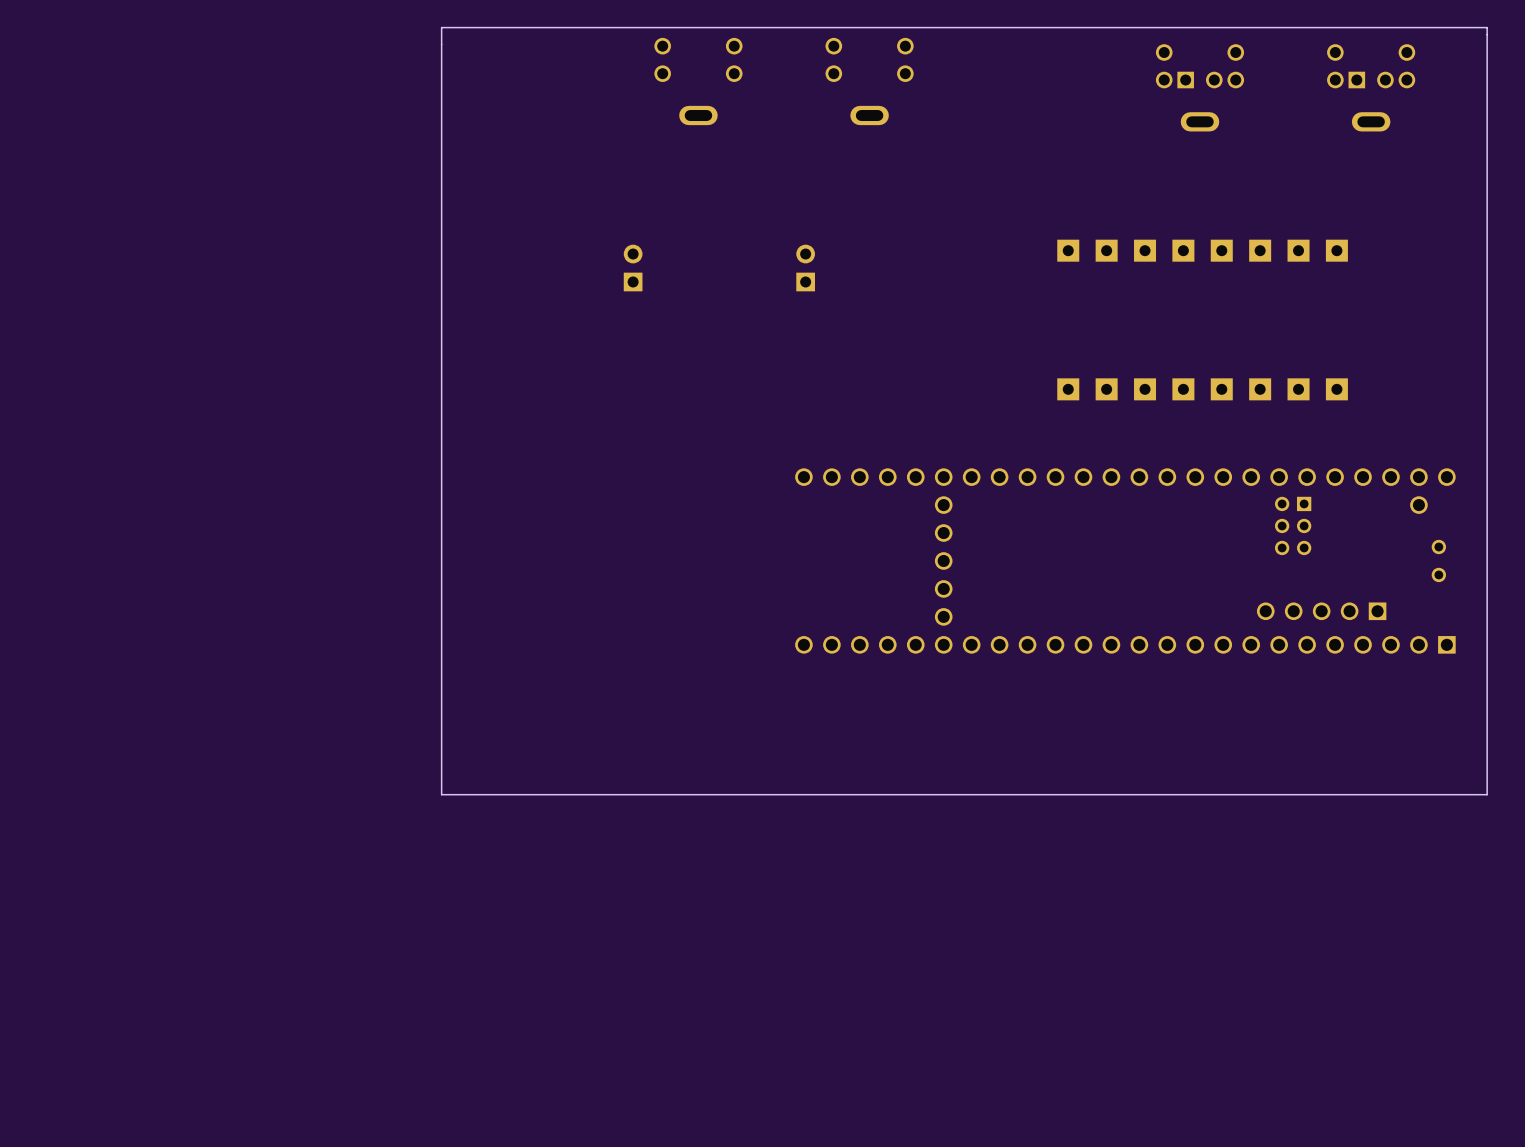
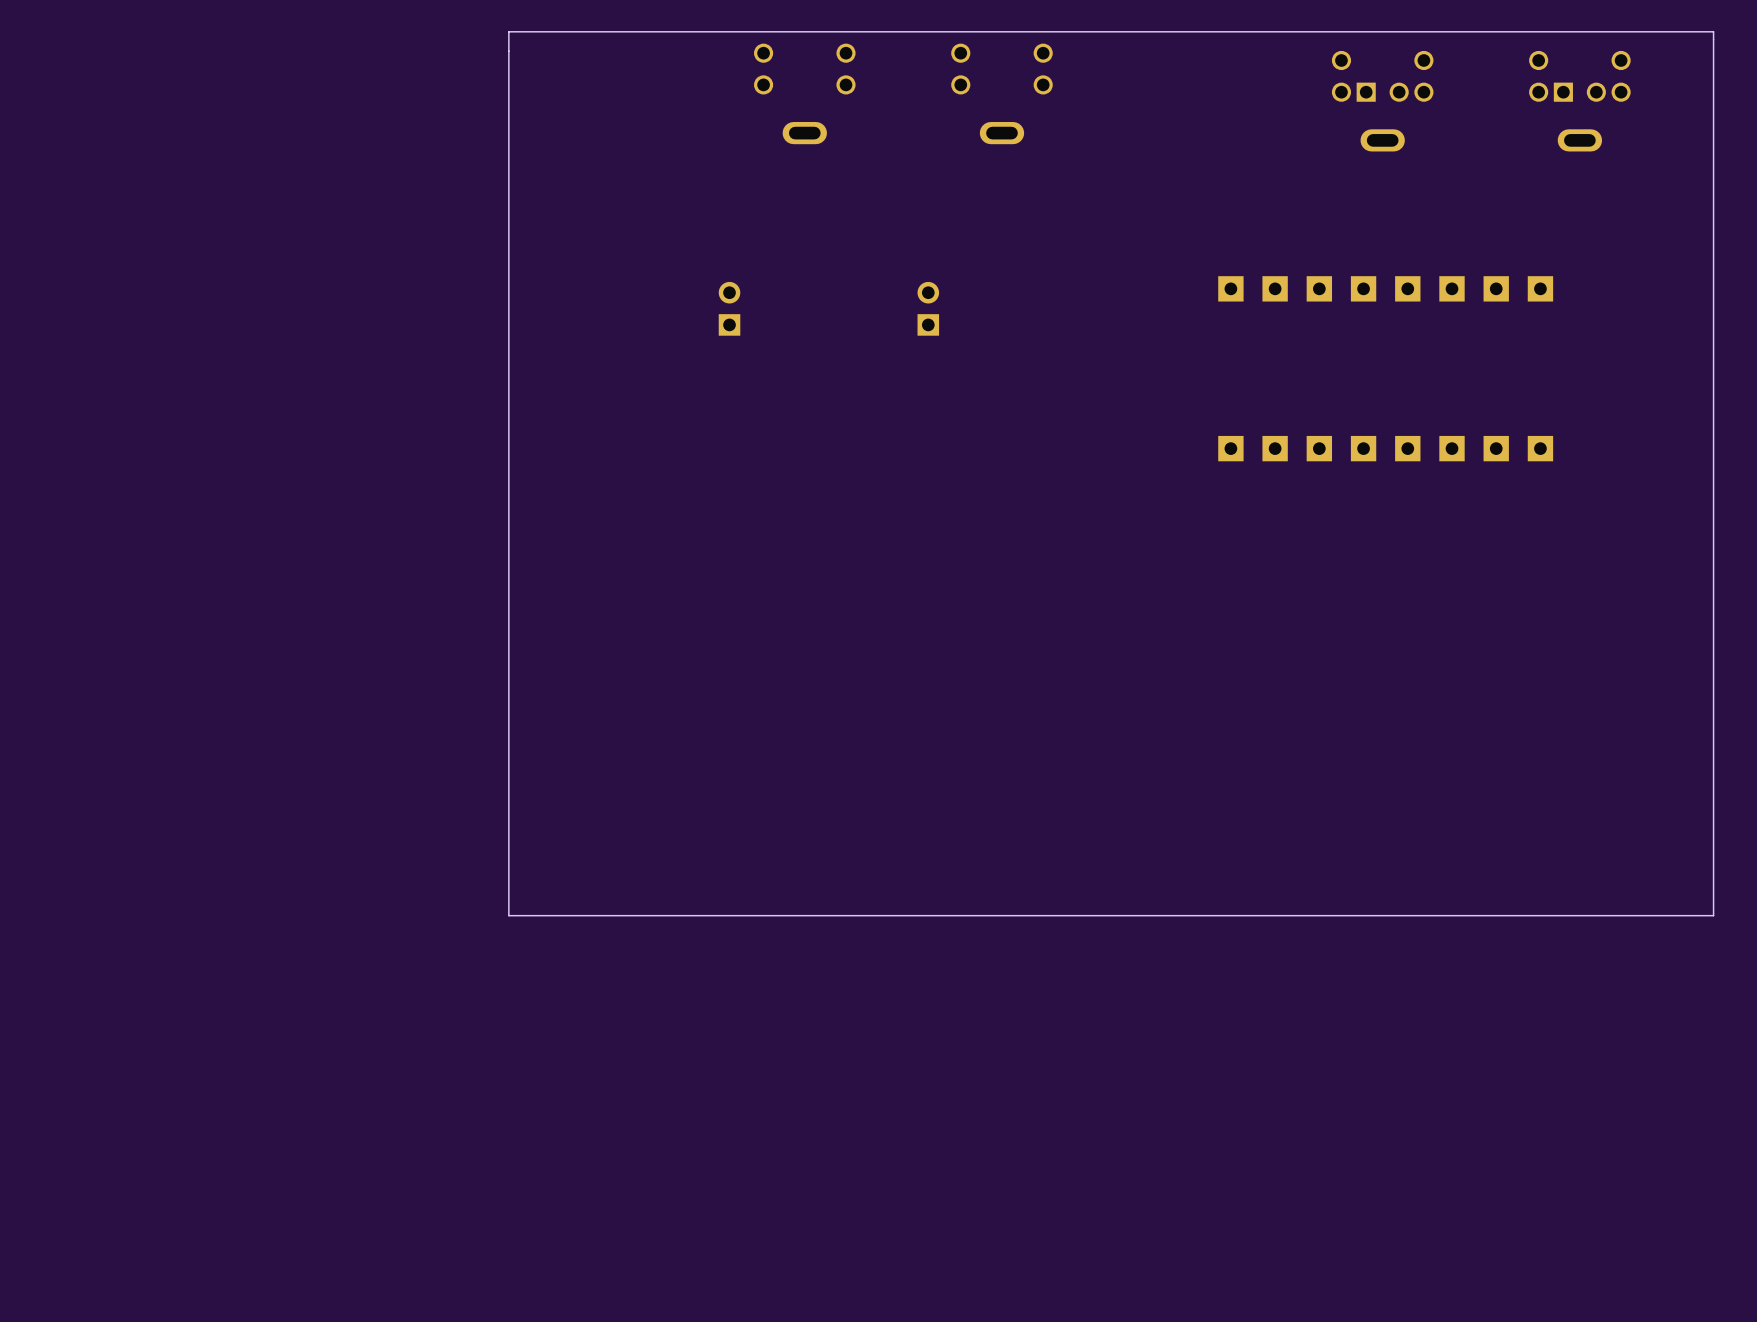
part: (1125, 560) -> none

